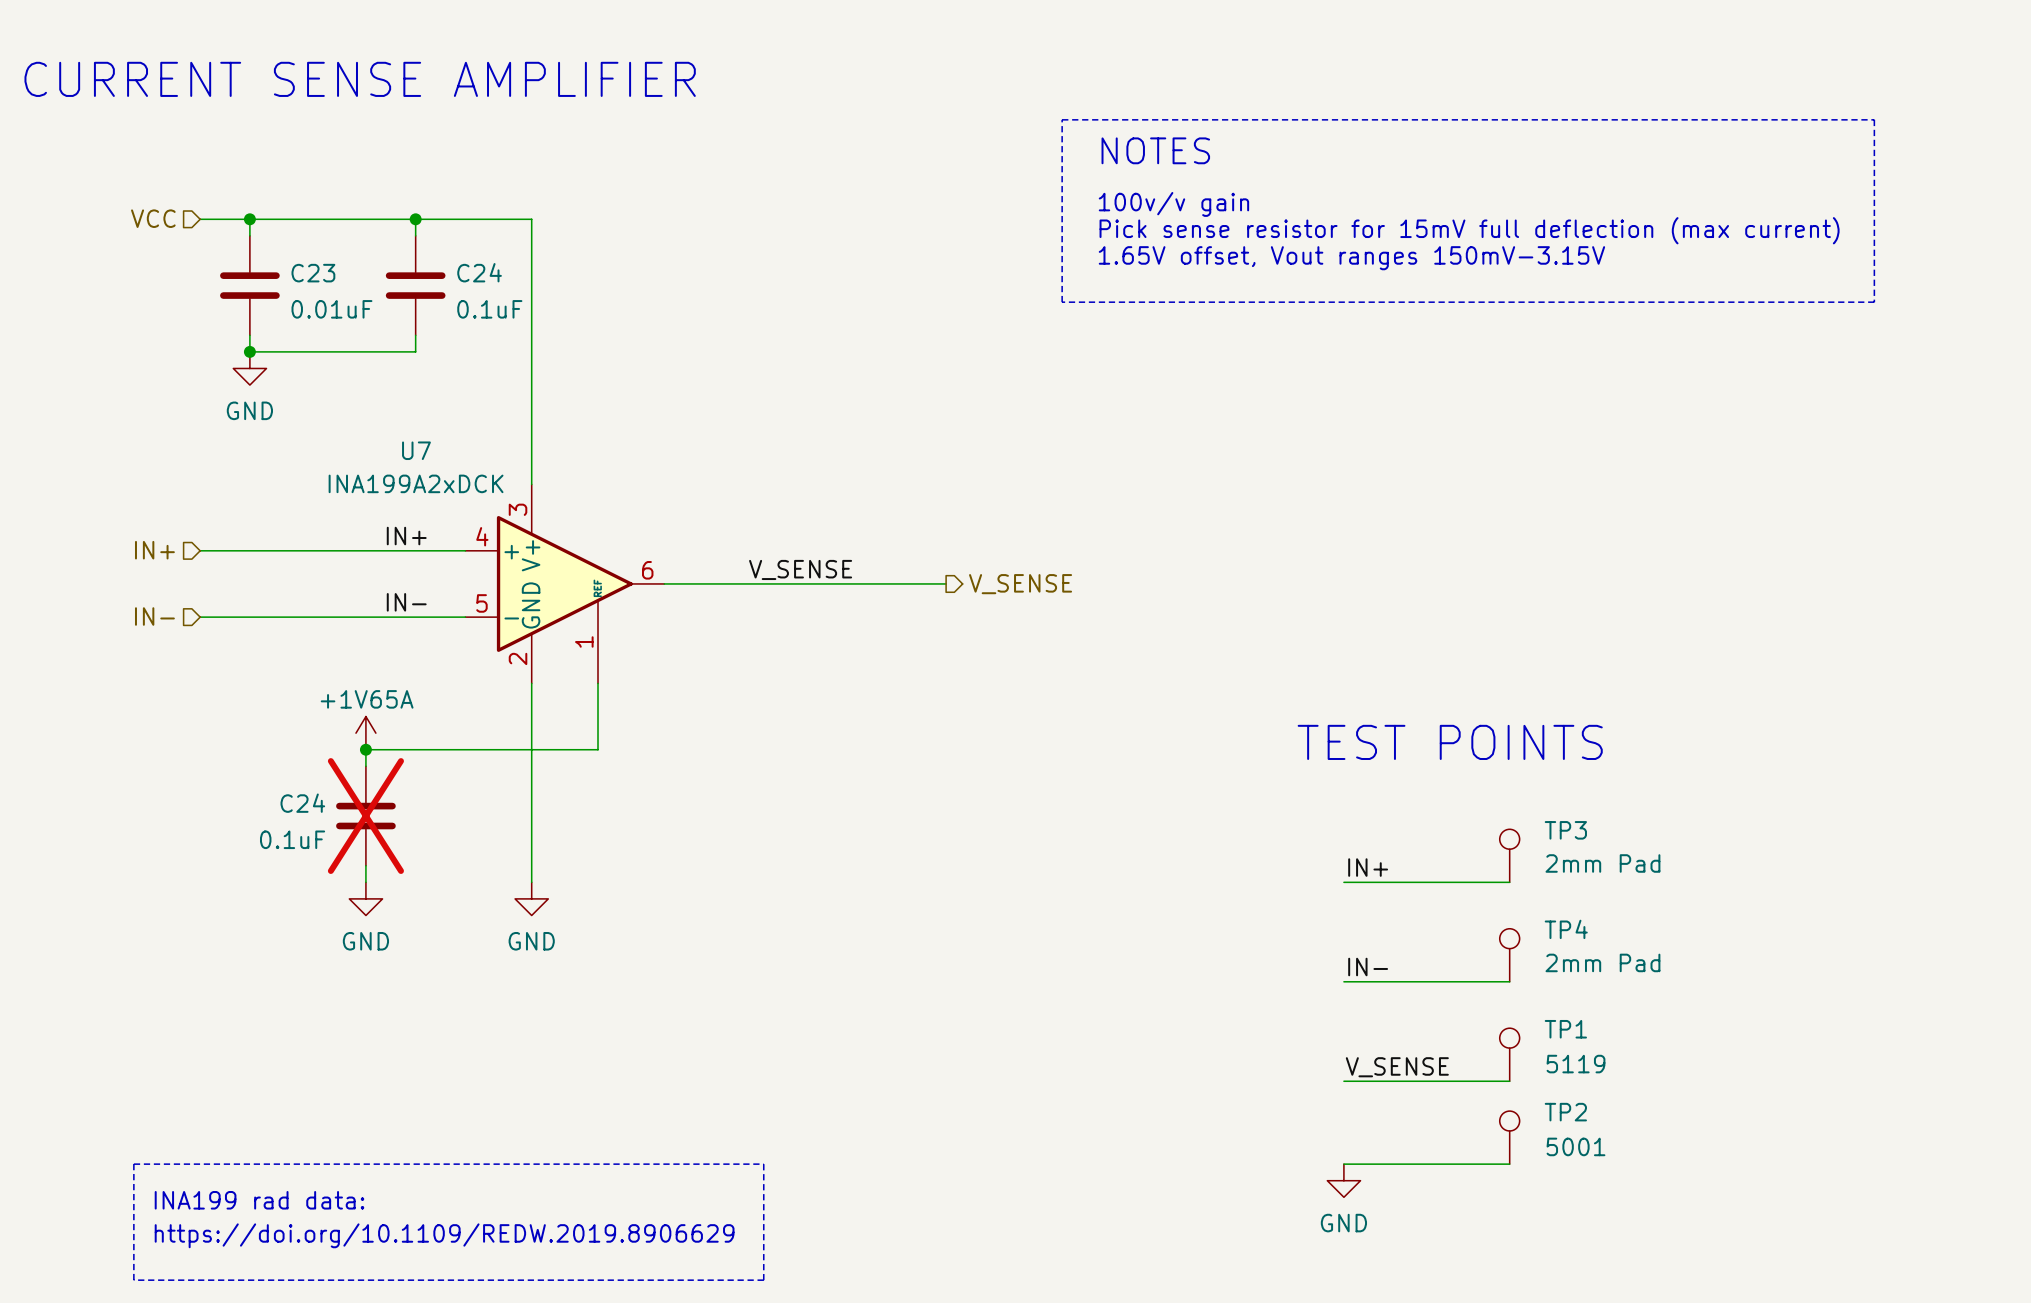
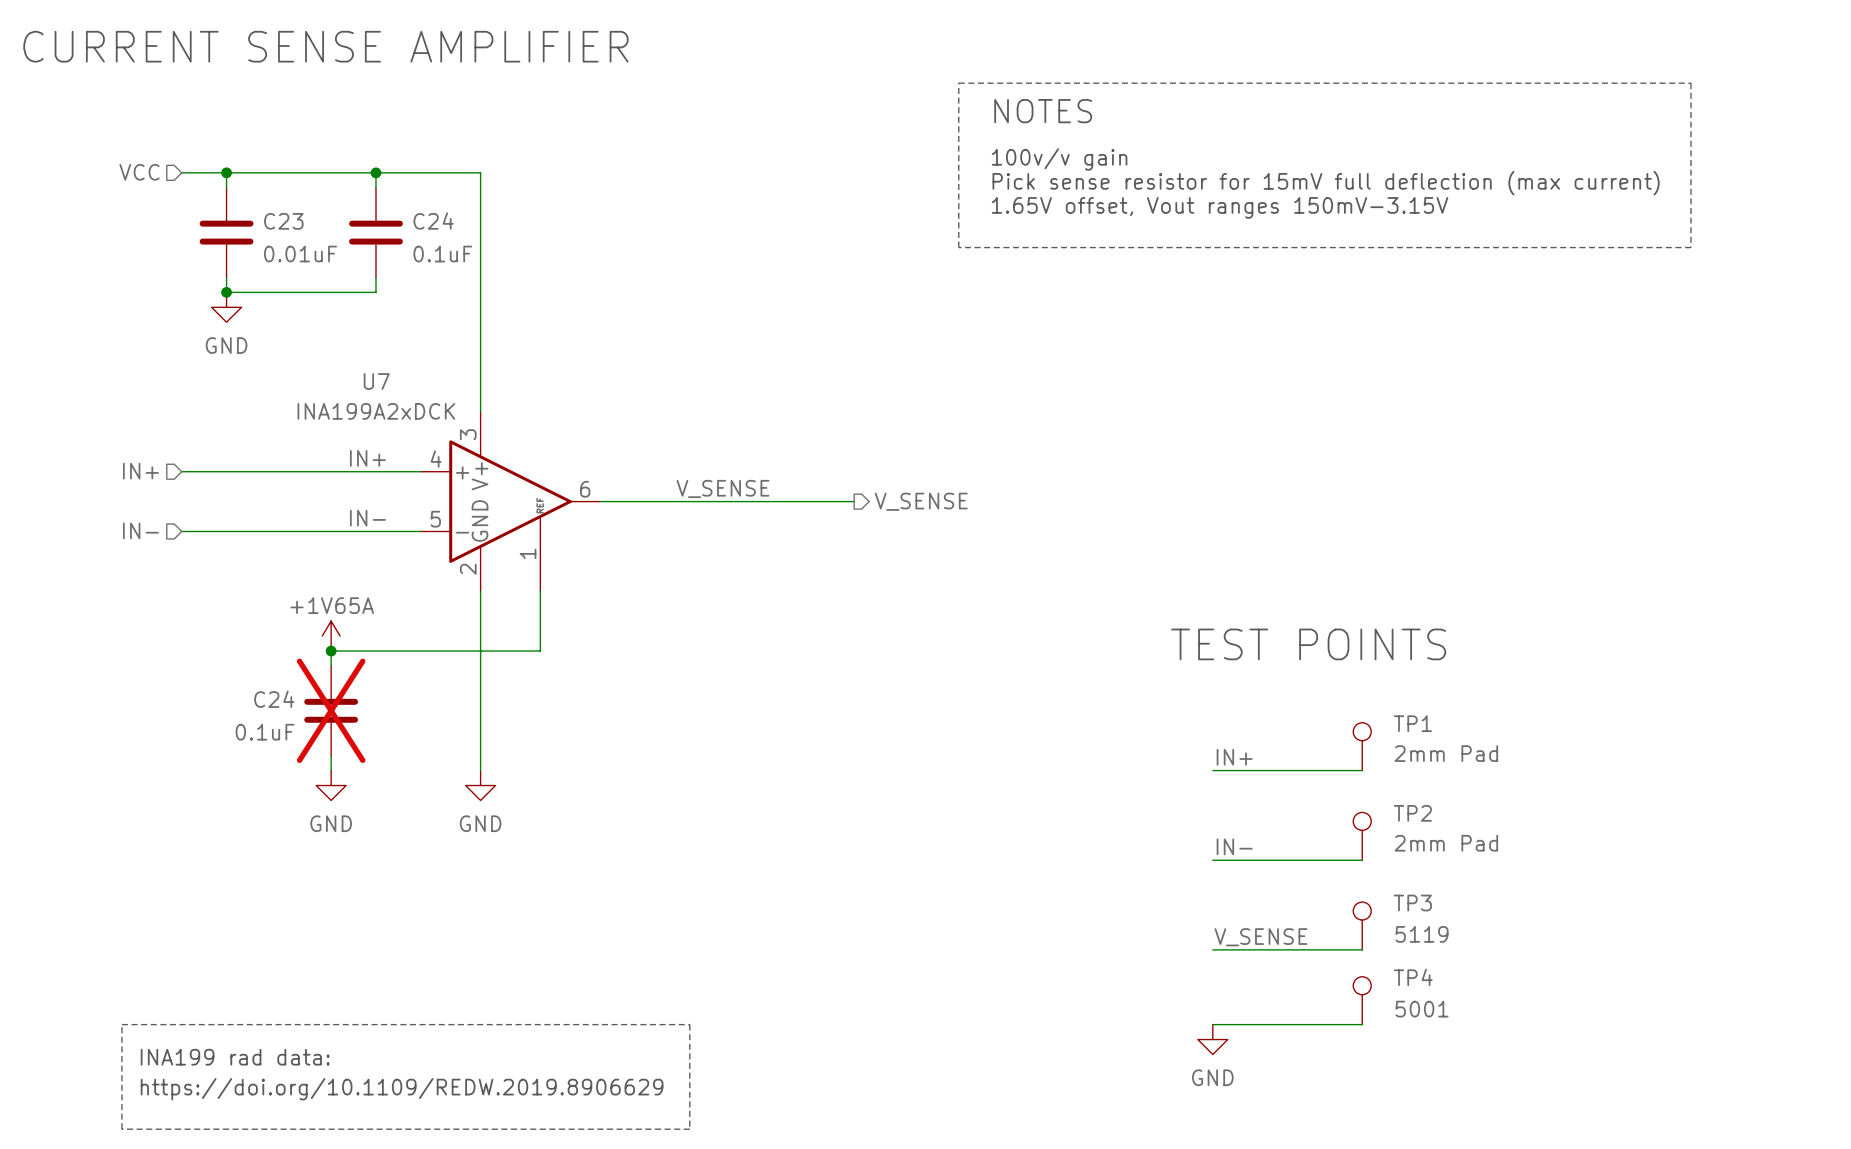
TP3 name: TP3 (1565, 830) -> TP1 (1412, 723)
TP4 name: TP4 (1566, 929) -> TP2 (1412, 813)
TP1 name: TP1 (1565, 1029) -> TP3 (1412, 903)
TP2 name: TP2 (1565, 1112) -> TP4 (1413, 977)

